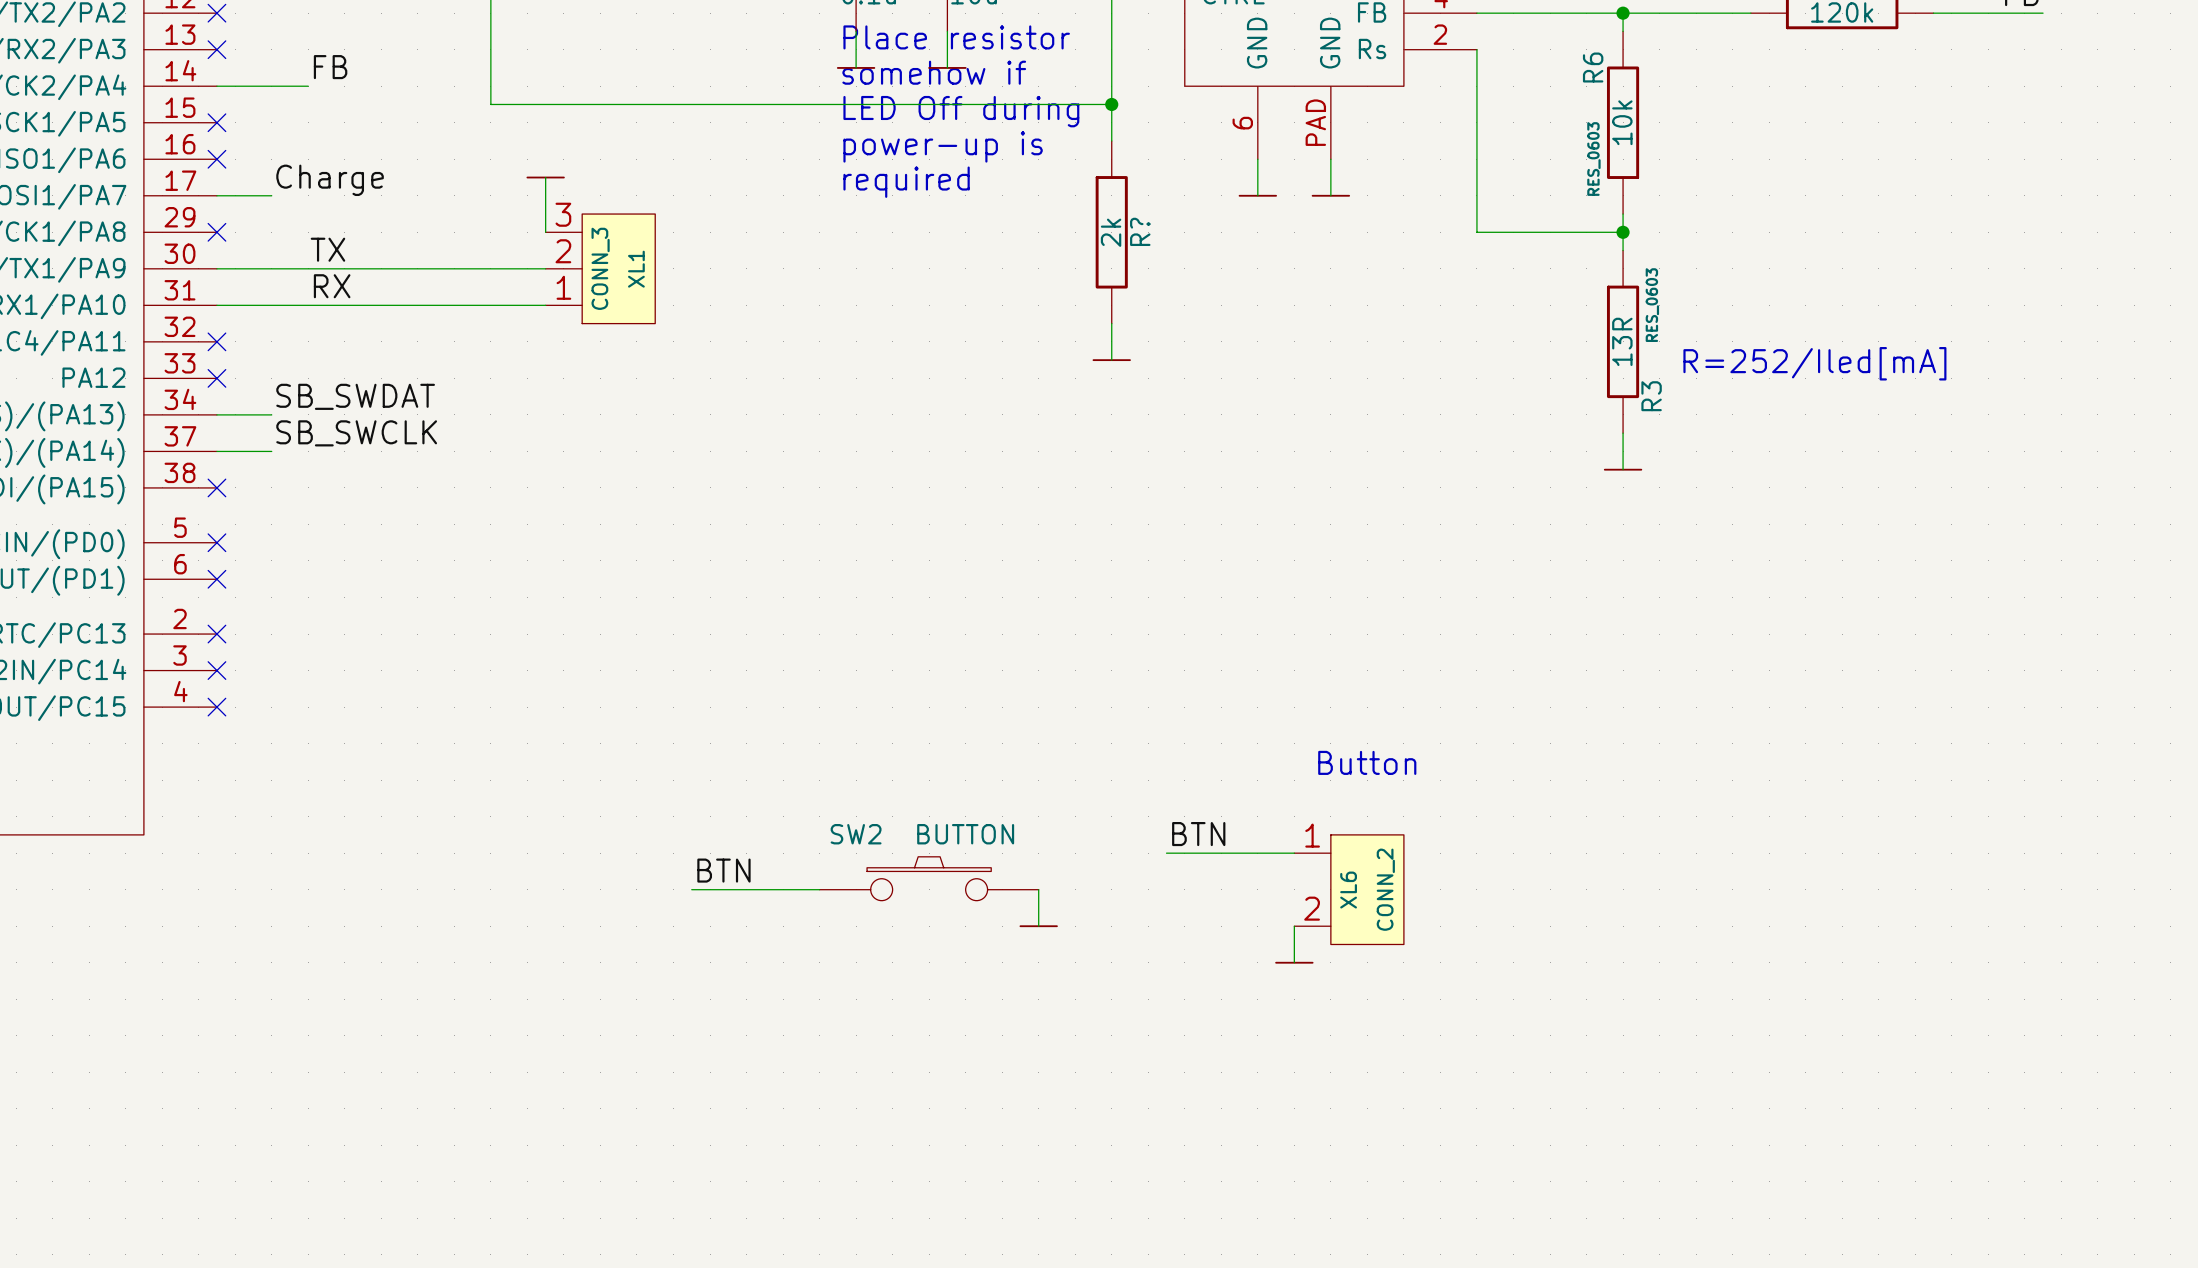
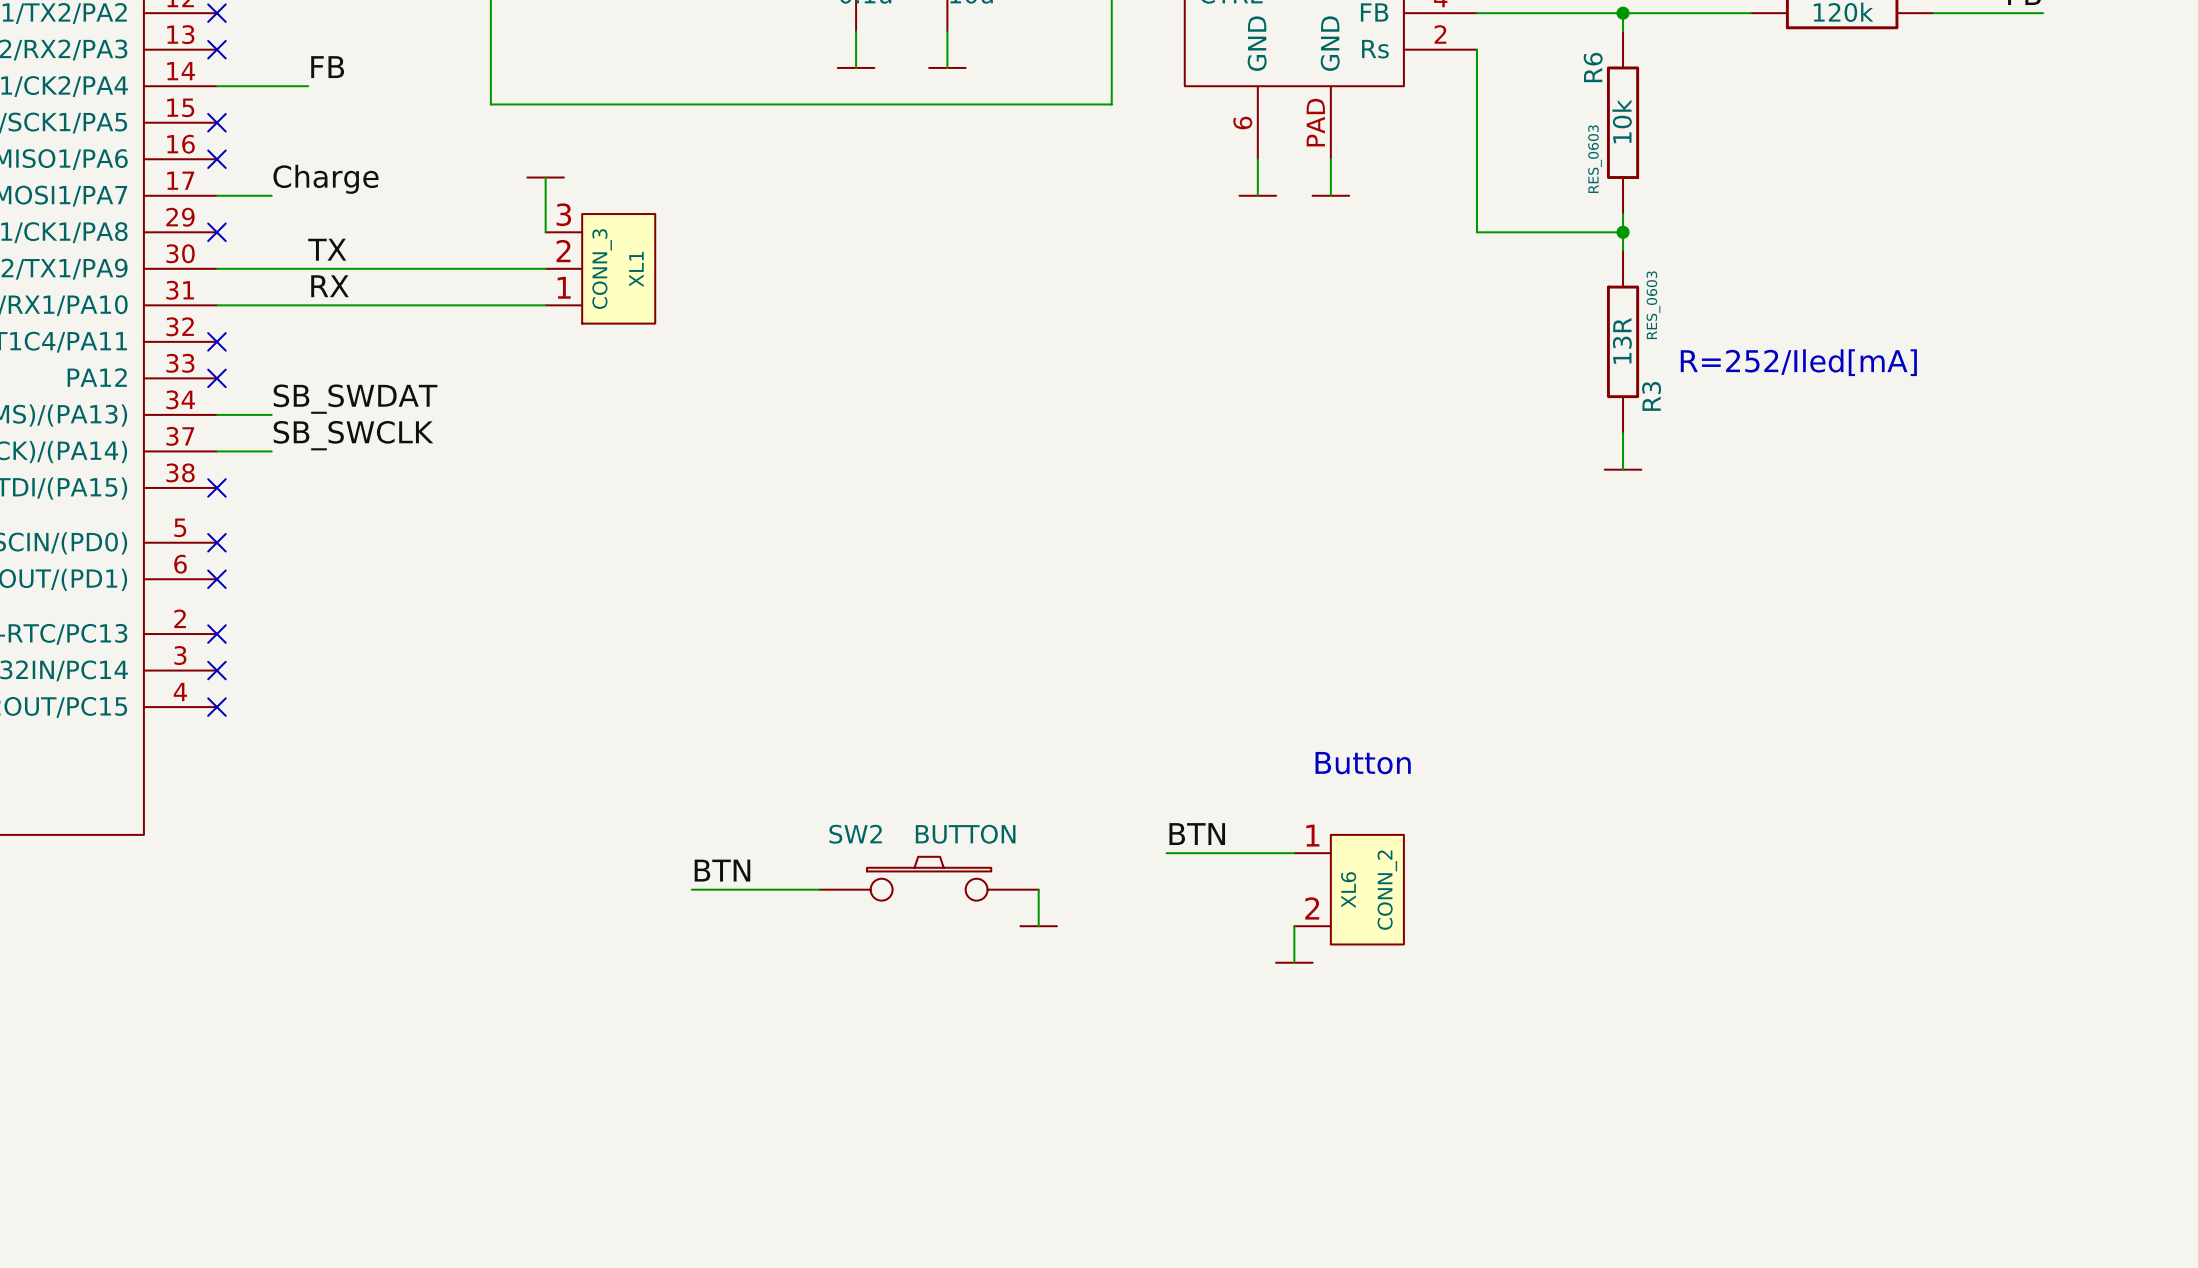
text: Place resistor (956, 37) -> none
text: somehow if (934, 72) -> none
wire: (1111, 104) (1111, 140) -> none
junction: (1111, 104) -> none
text: LED Off during (961, 111) -> none
text: power-up is (943, 146) -> none
text: required (906, 182) -> none
R?: 2k (1111, 232) -> none
wire: (1111, 323) (1111, 360) -> none
power symbol: (1111, 360) -> none

